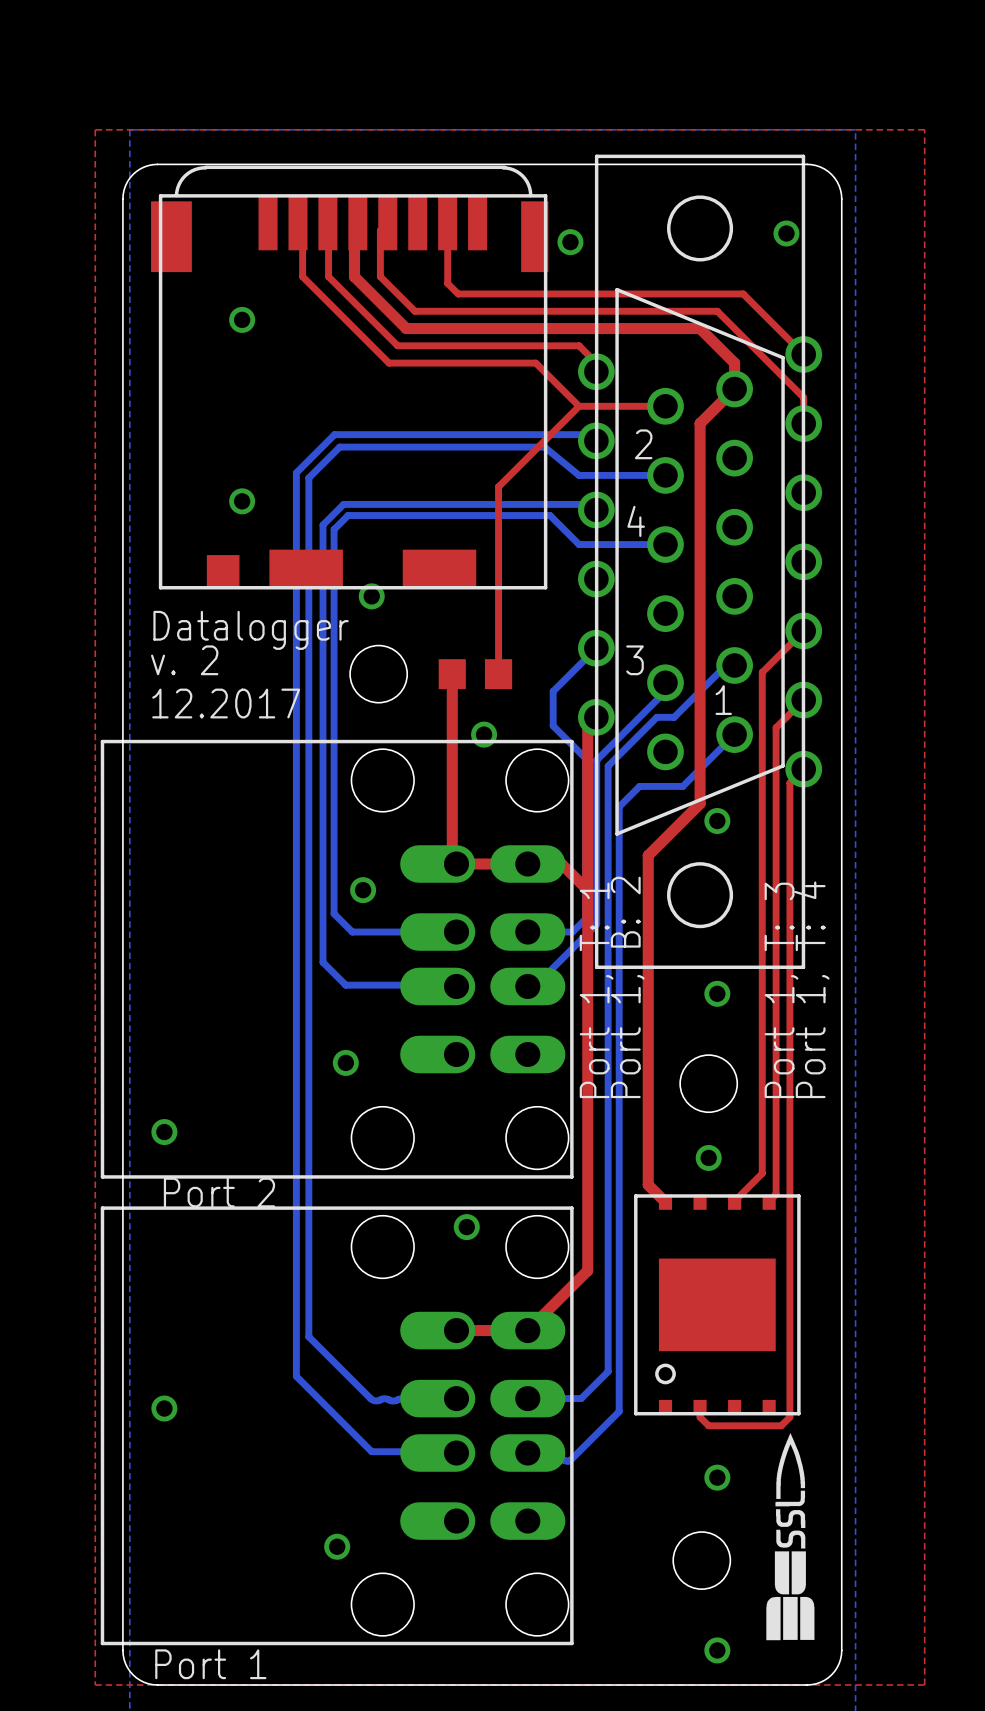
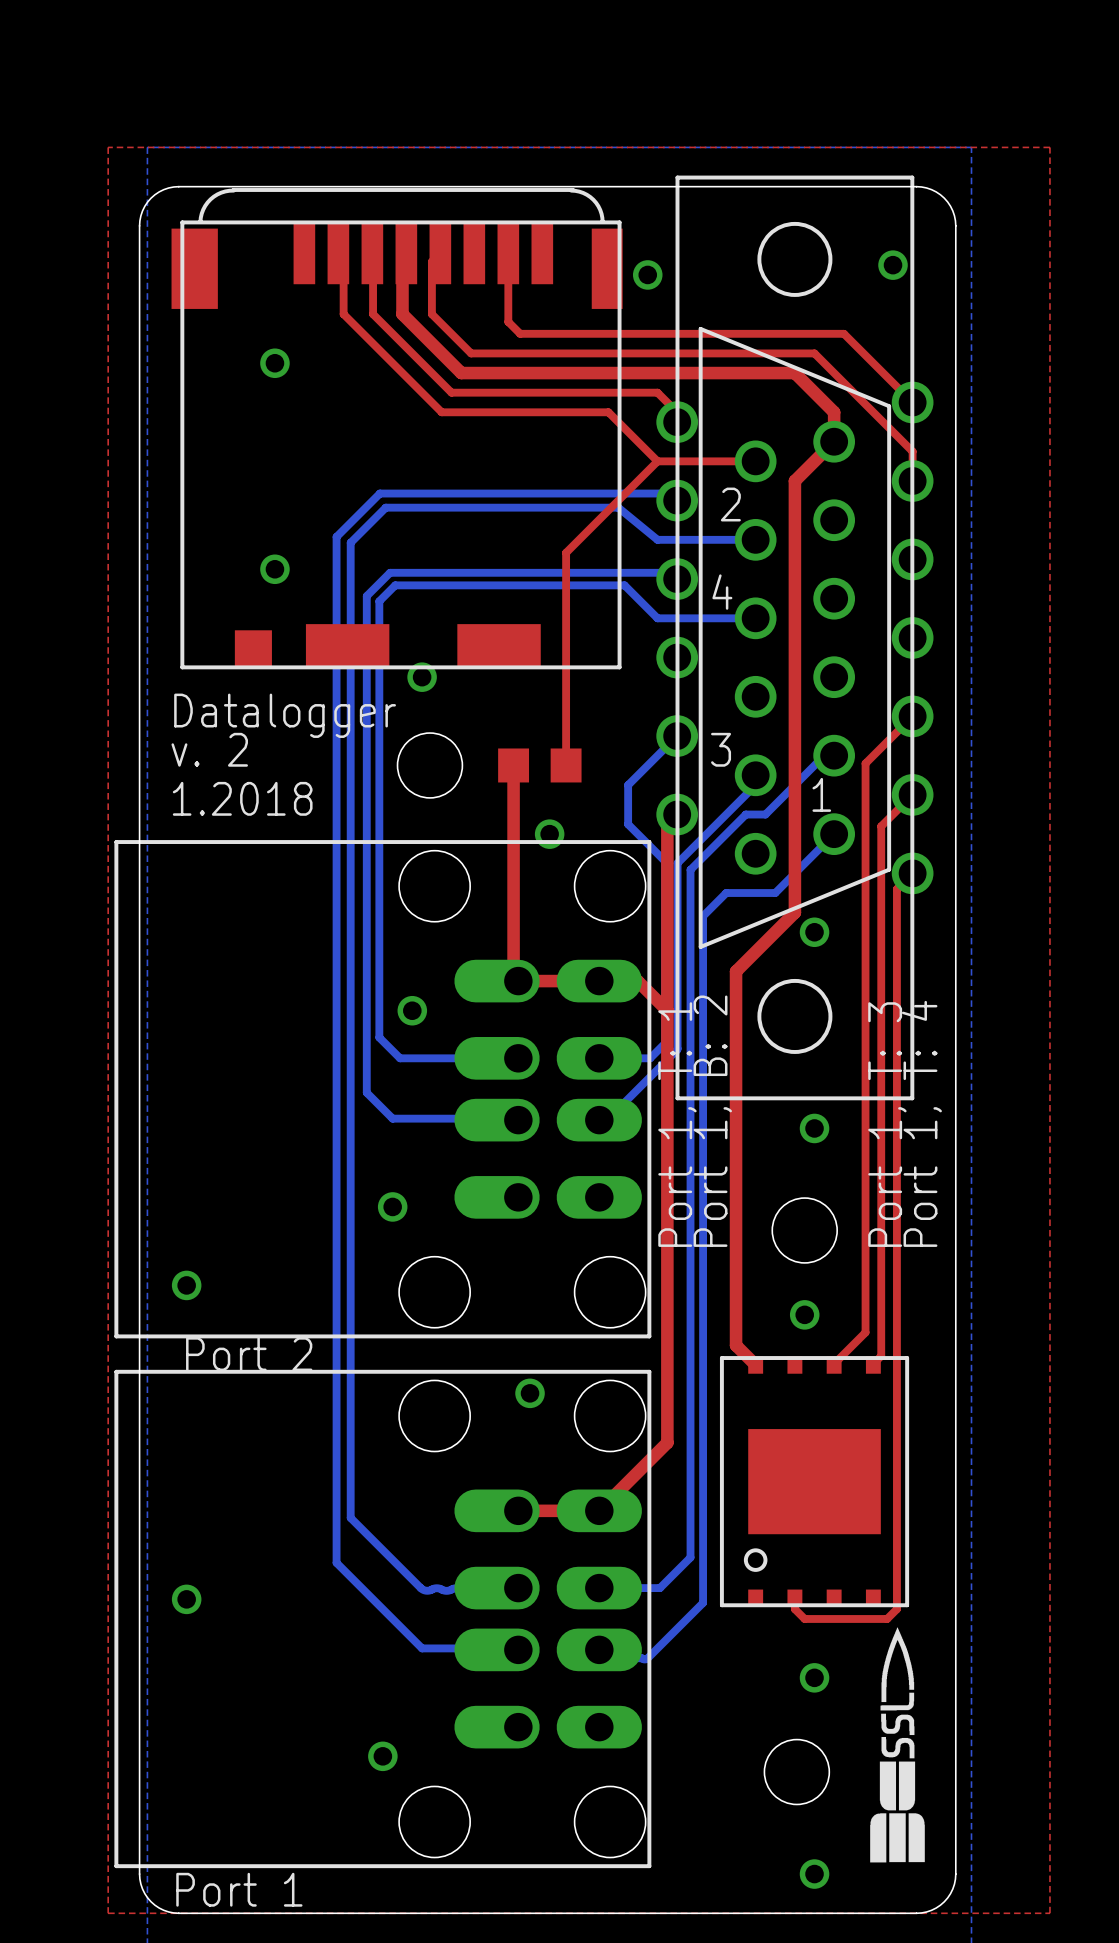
text: 12.2017 (226, 703) -> 1.2018 (242, 798)

